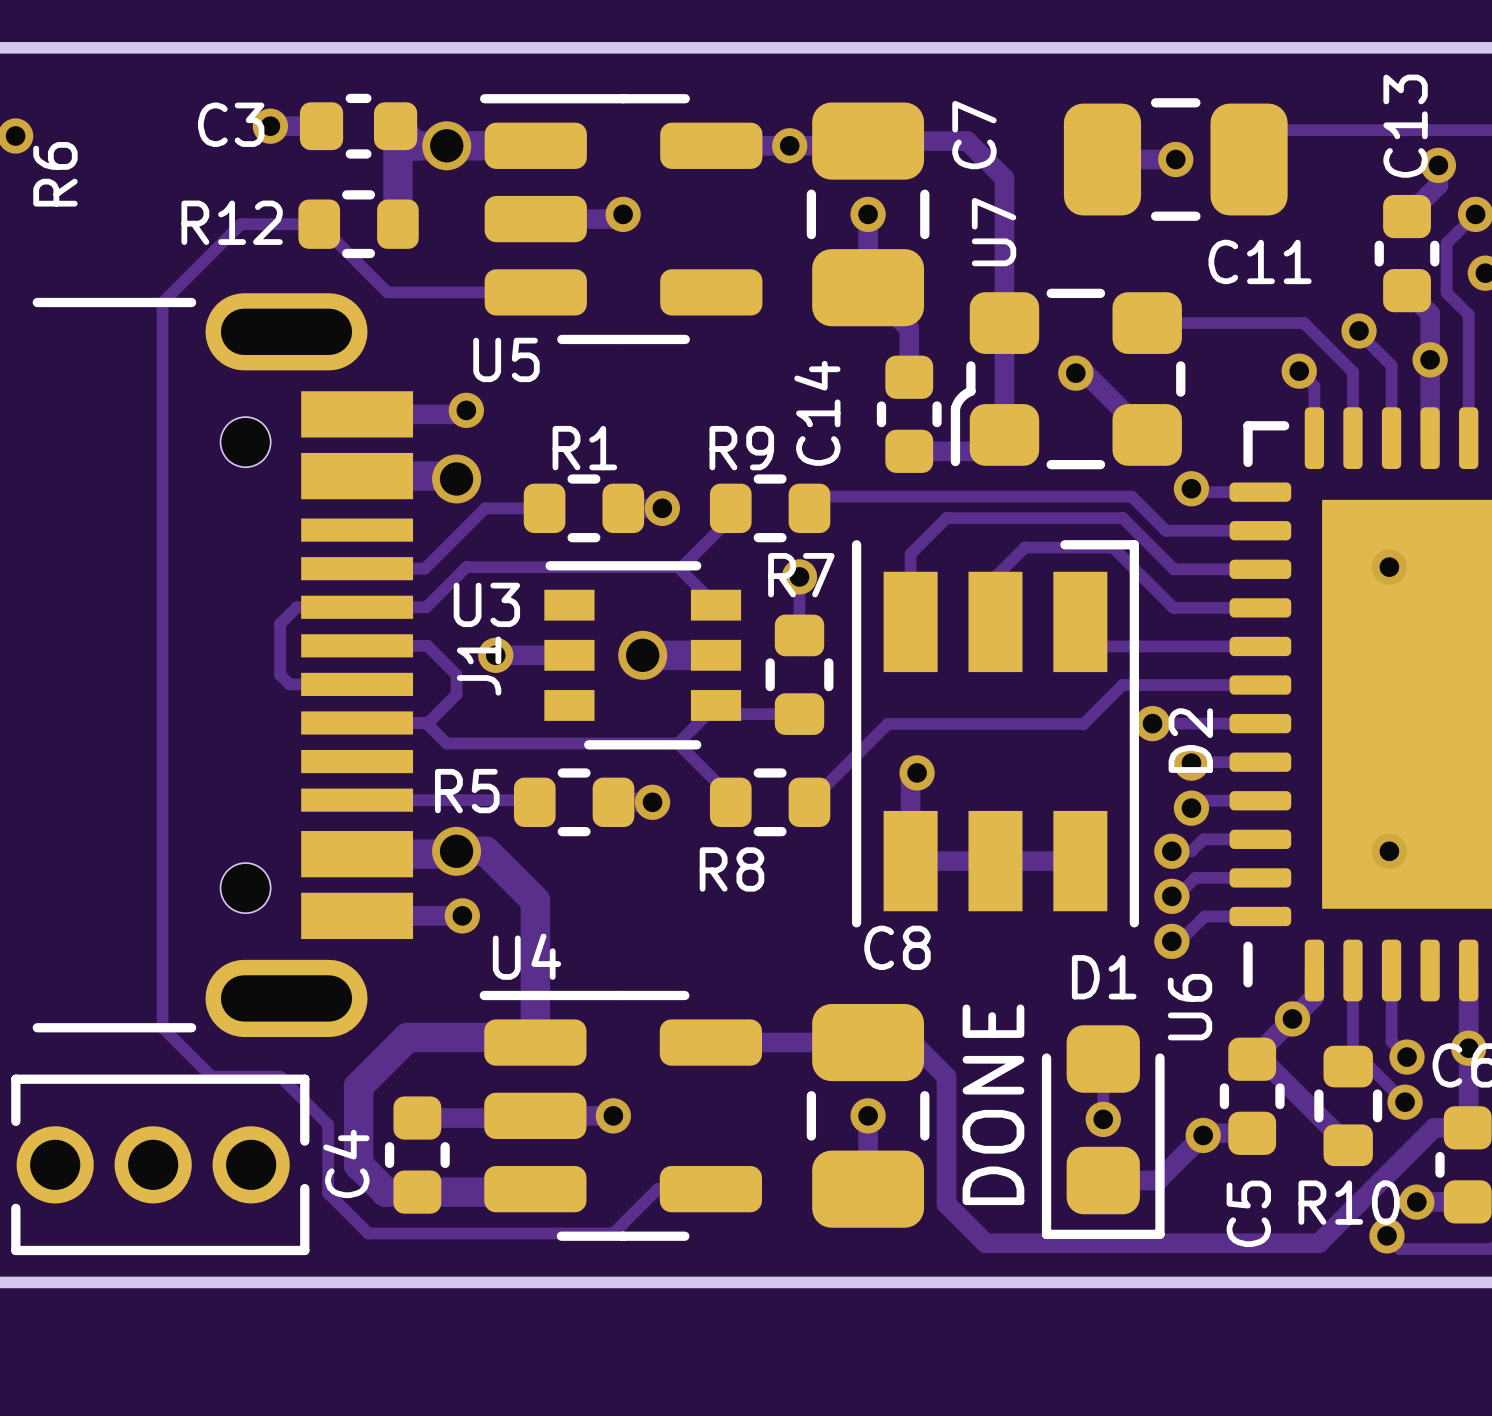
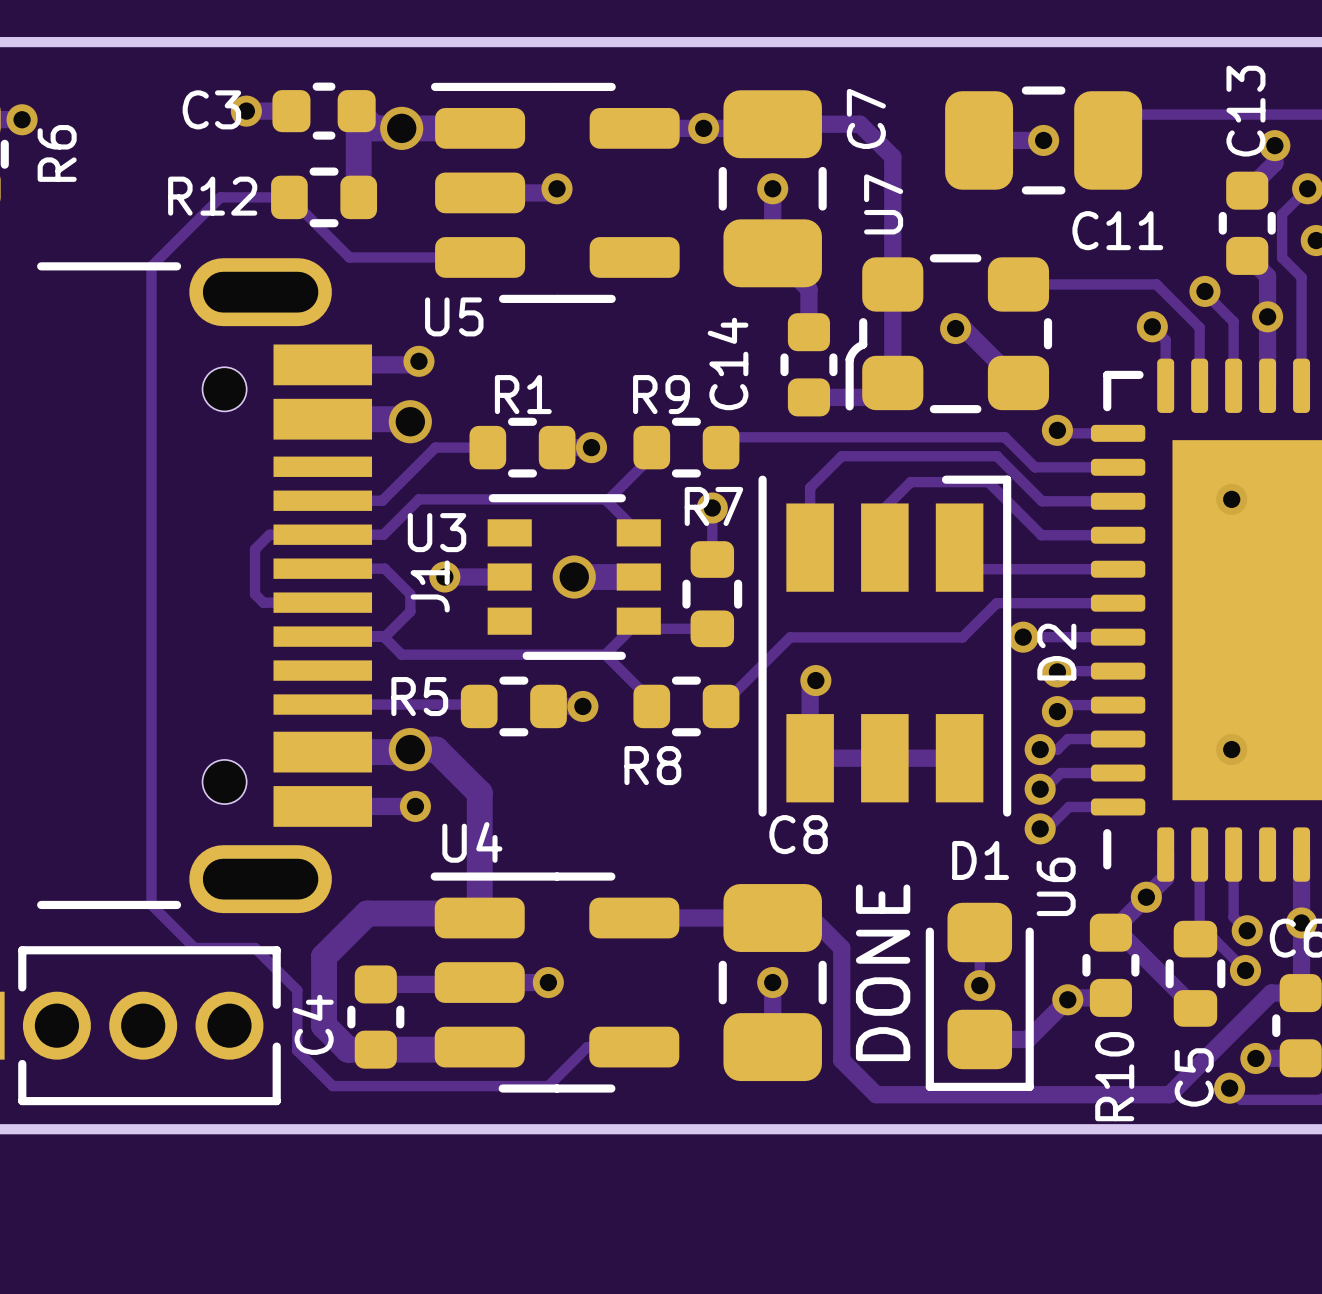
R10 name rotation: 0° (1349, 1202) -> 90° counterclockwise (1114, 1076)
C5 name position: C5 (1248, 1213) -> C5 (1194, 1077)

